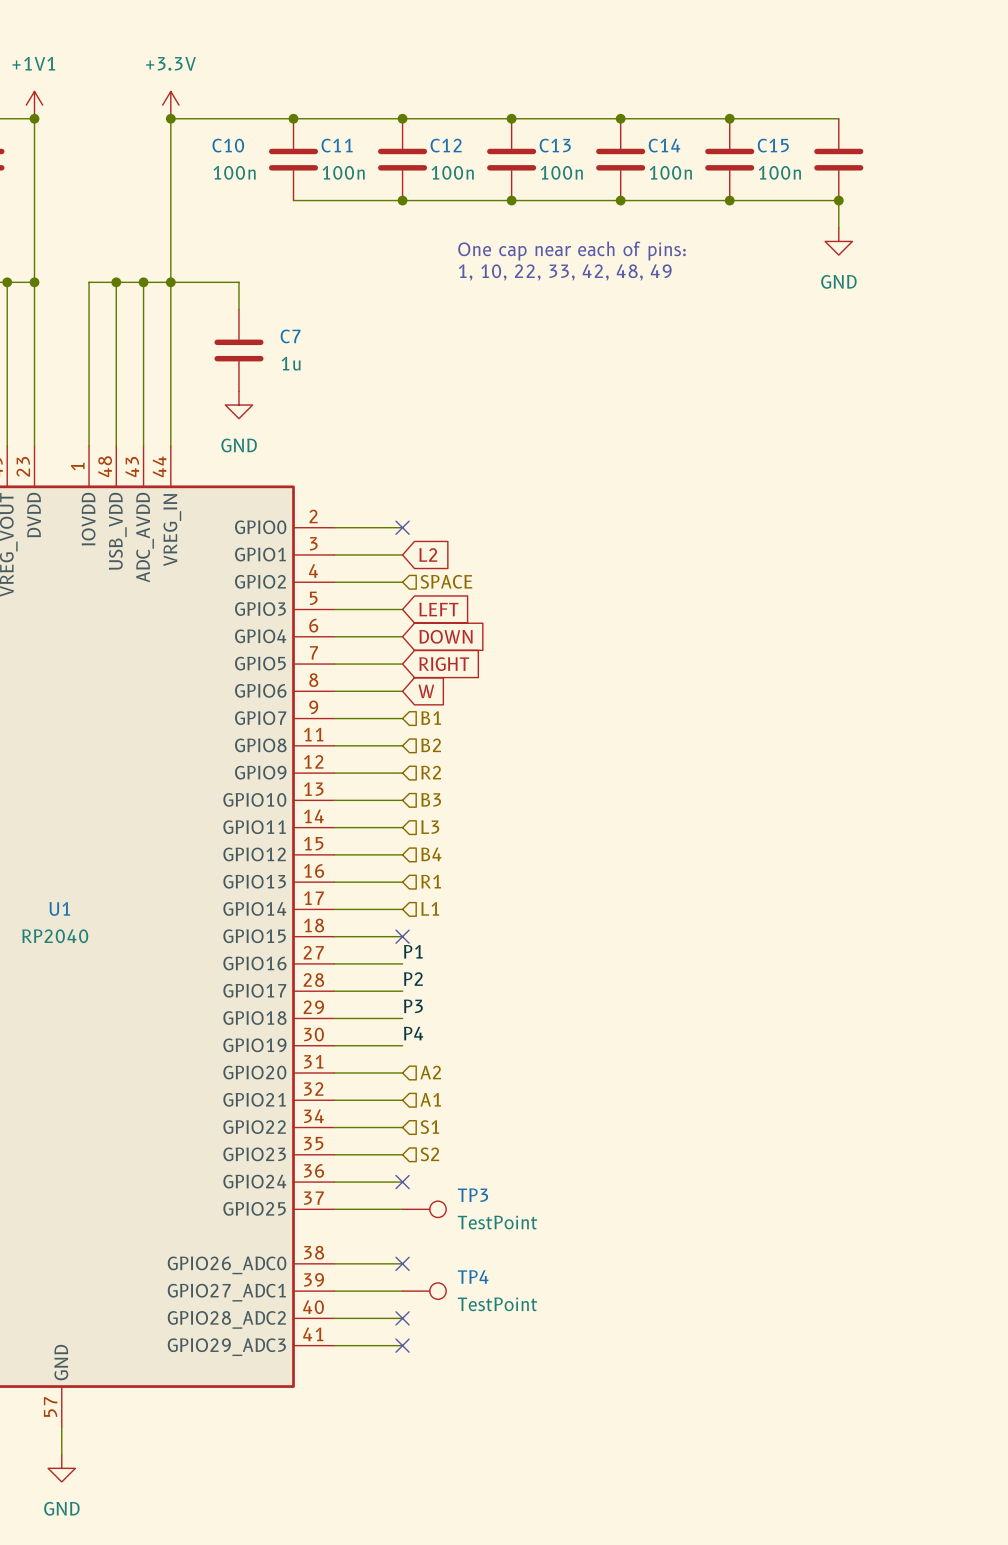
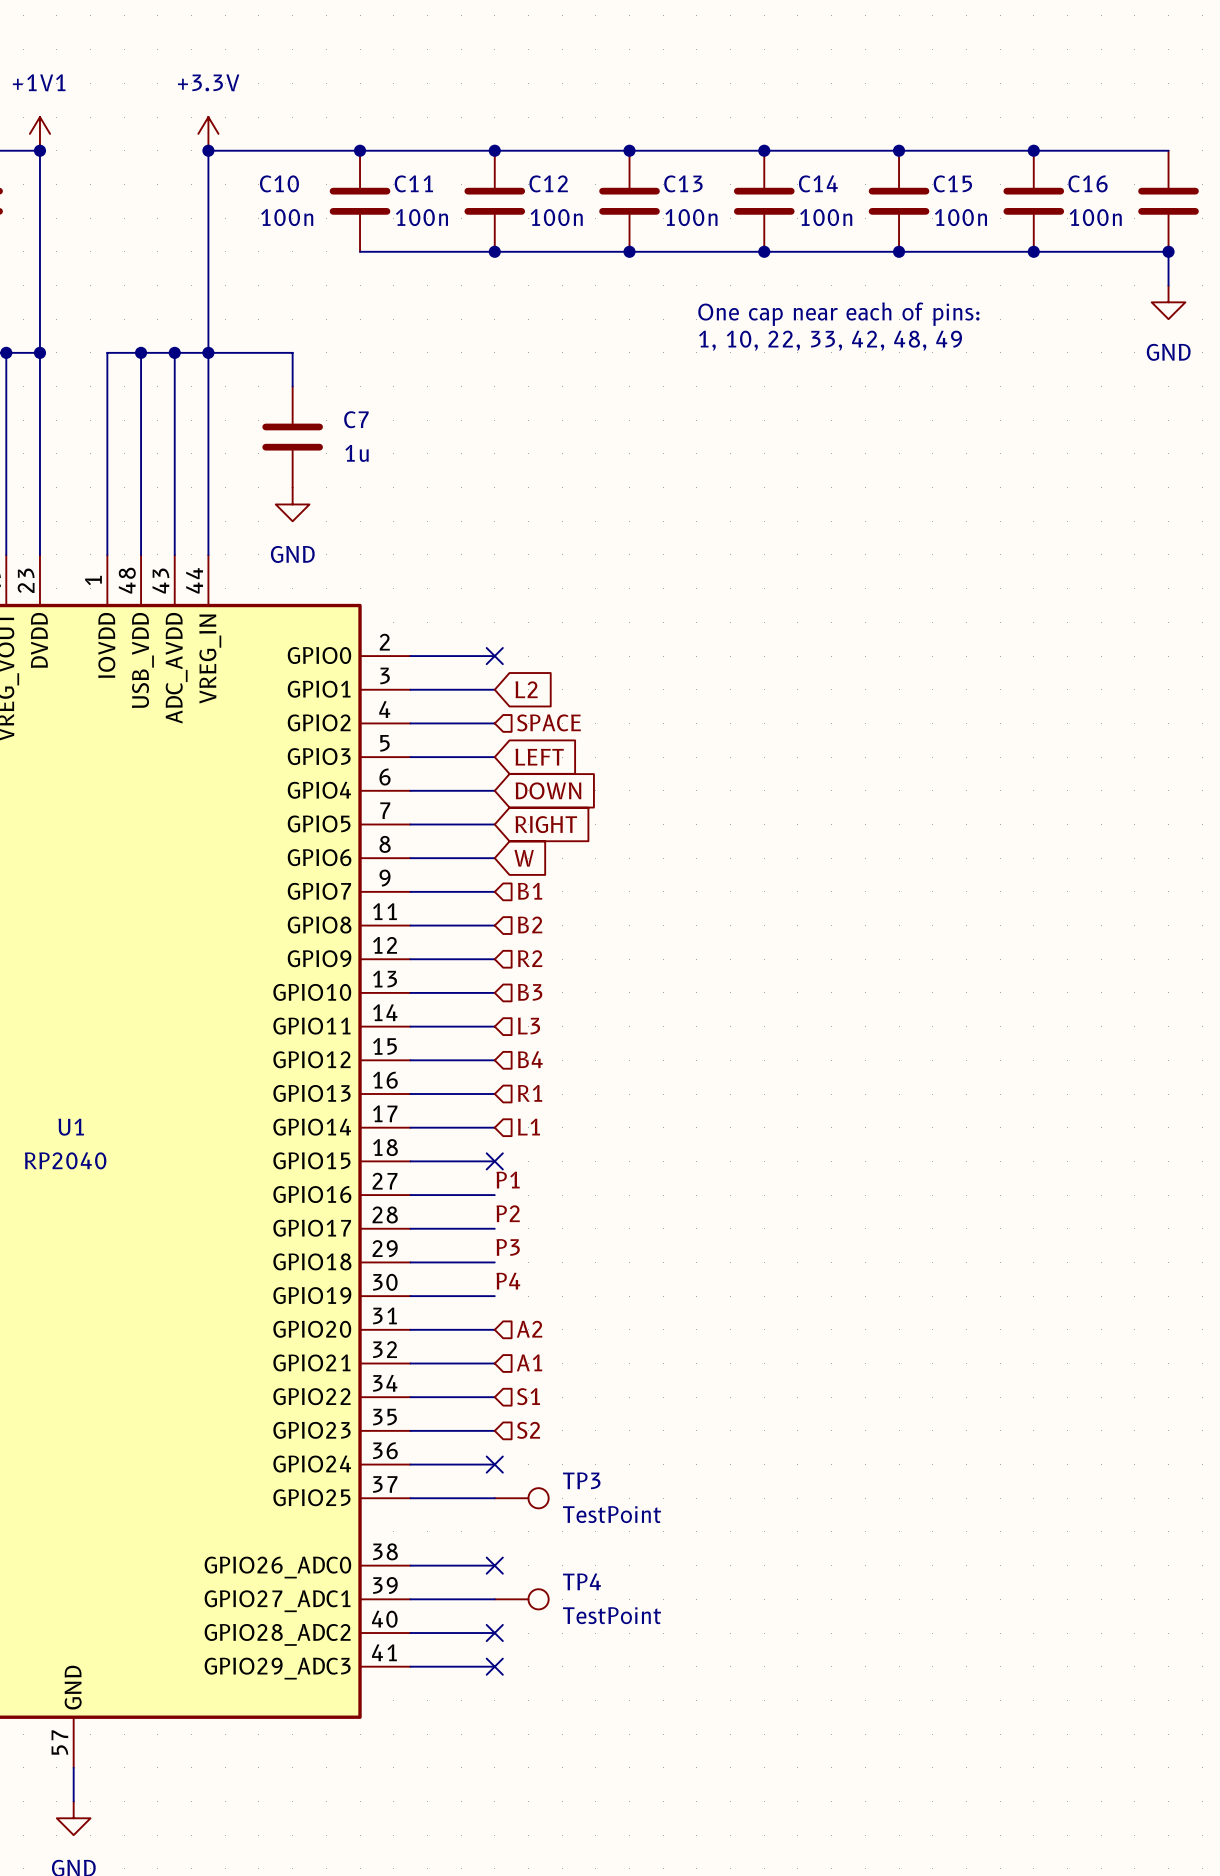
wire: none -> (1033, 150) (1168, 150)
junction: none -> (1033, 150)
C16: none -> 100n (1168, 201)
wire: (838, 200) (838, 227) -> (1033, 251) (1168, 251) (1168, 285)
junction: none -> (1168, 251)
power symbol position: GND (838, 241) -> GND (1168, 302)
text position: One cap near each of pins: (571, 251) -> One cap near each of pins: (838, 314)
text position: 1, 10, 22, 33, 42, 48, 49 (565, 272) -> 1, 10, 22, 33, 42, 48, 49 (830, 340)

